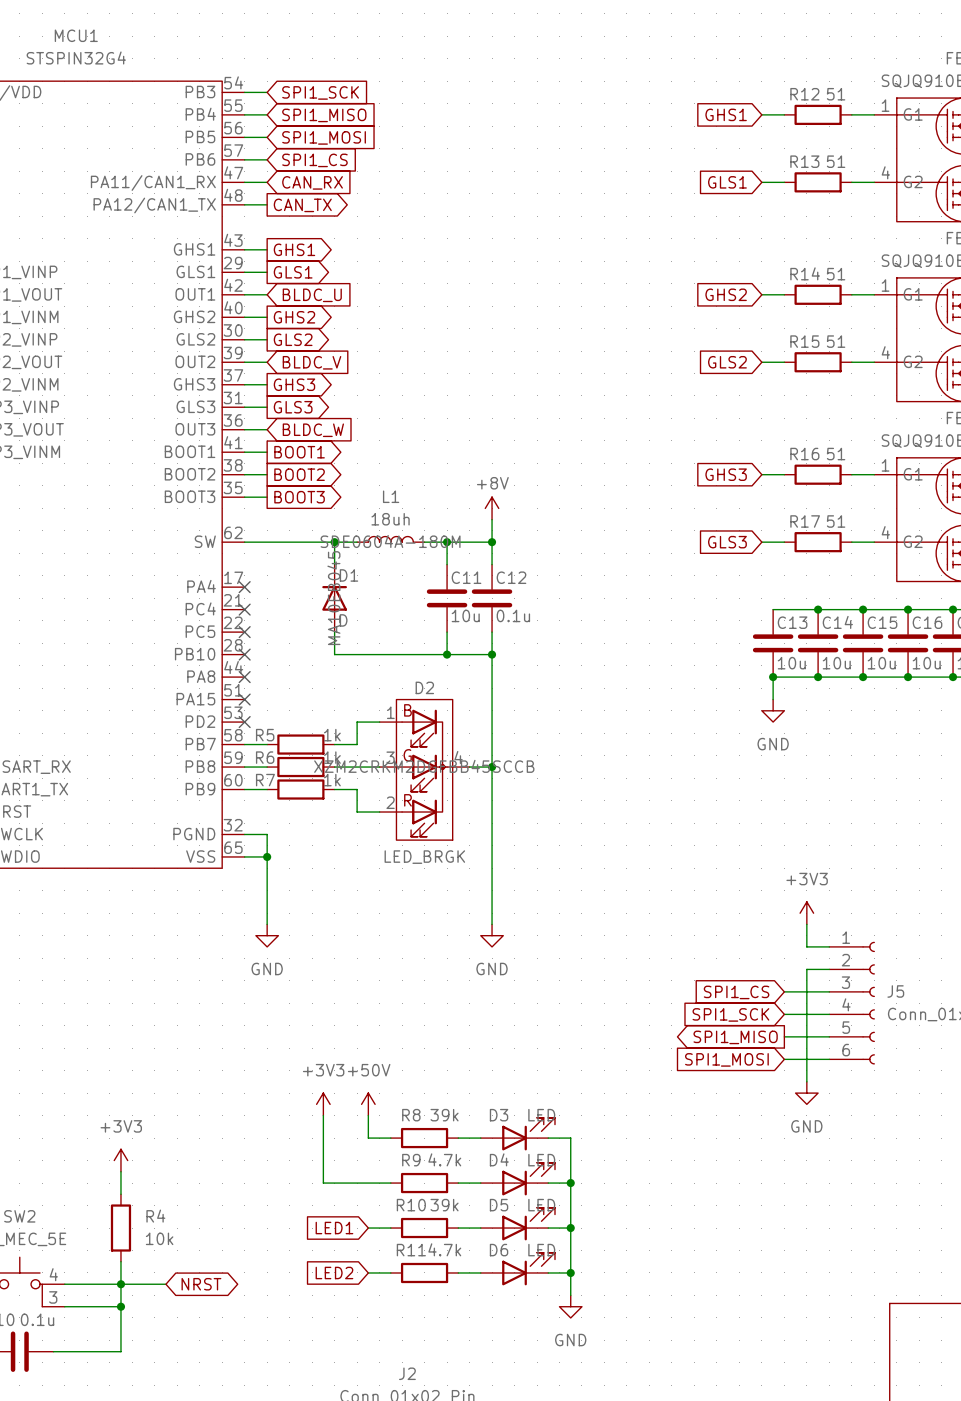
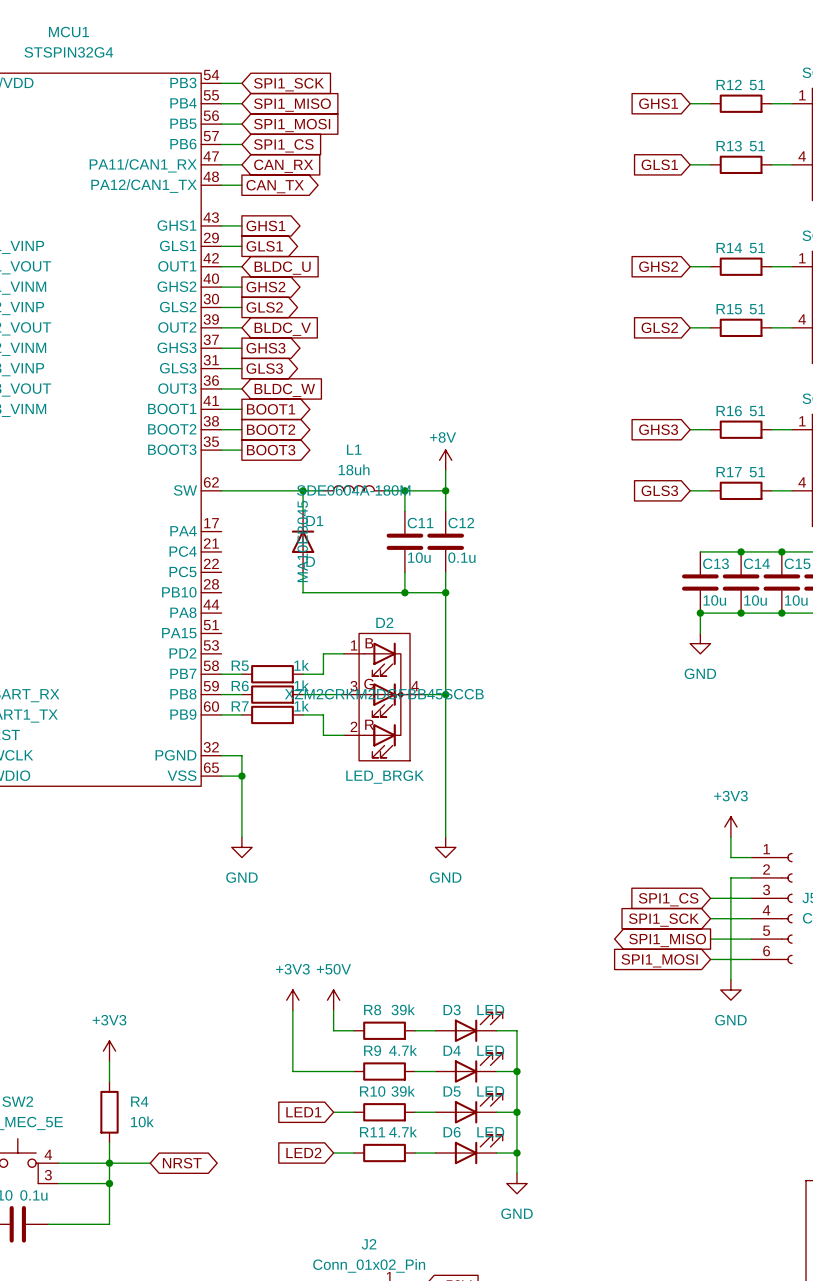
no-connect mark: (244, 587) -> none
no-connect mark: (244, 609) -> none
no-connect mark: (244, 632) -> none
no-connect mark: (244, 654) -> none
no-connect mark: (244, 677) -> none
no-connect mark: (244, 699) -> none
no-connect mark: (244, 722) -> none

